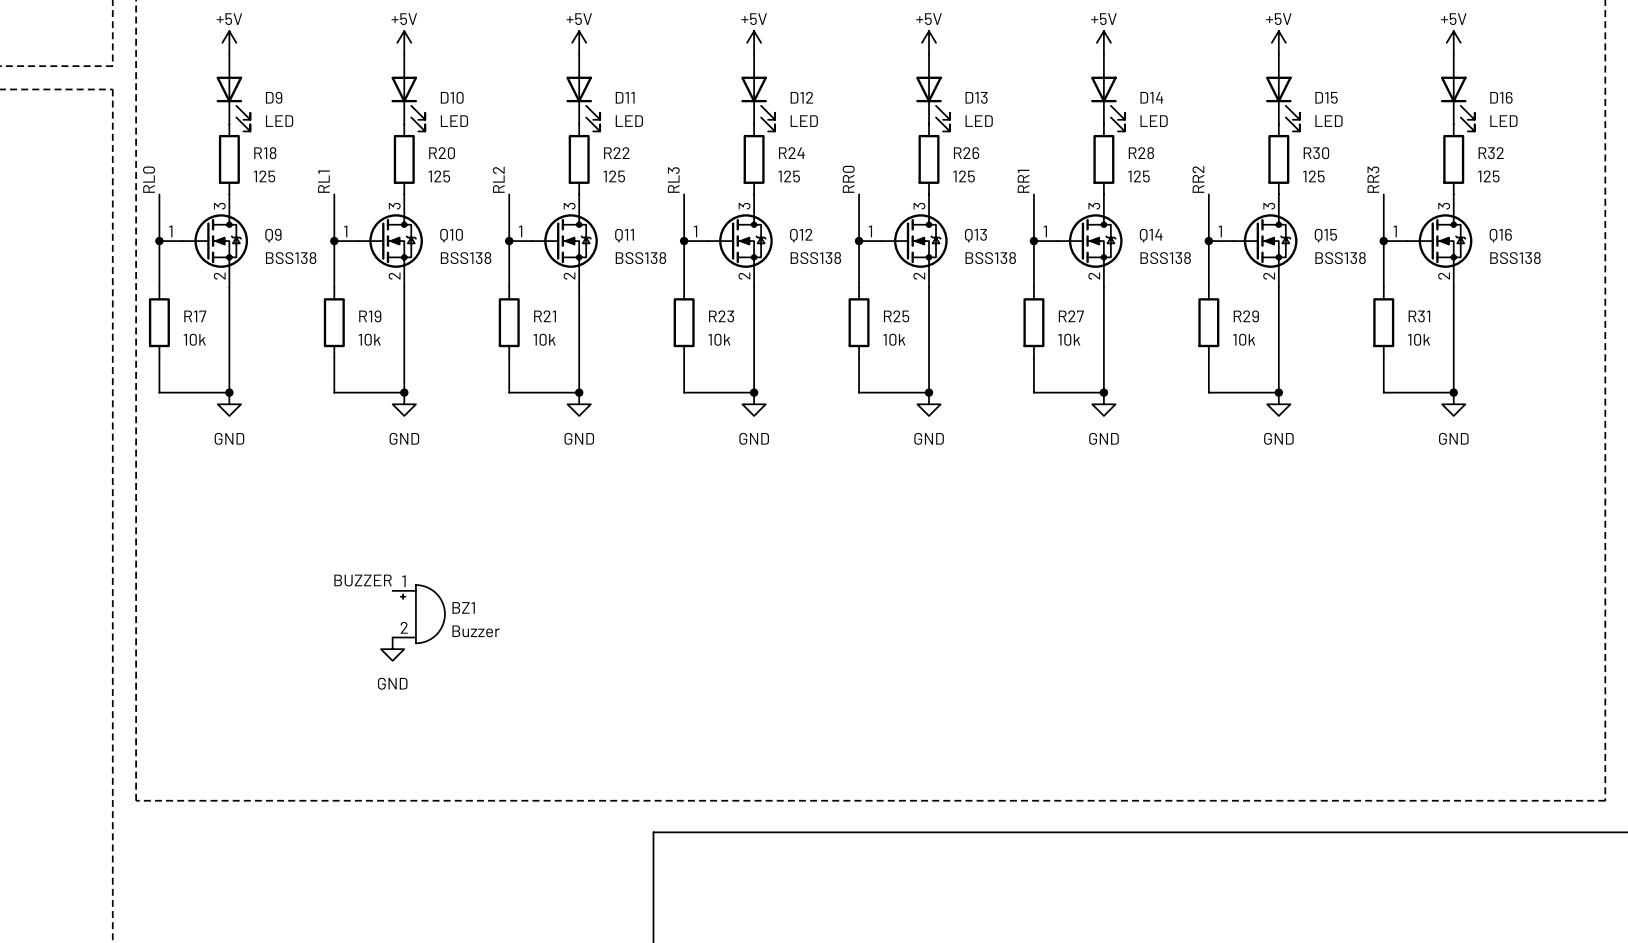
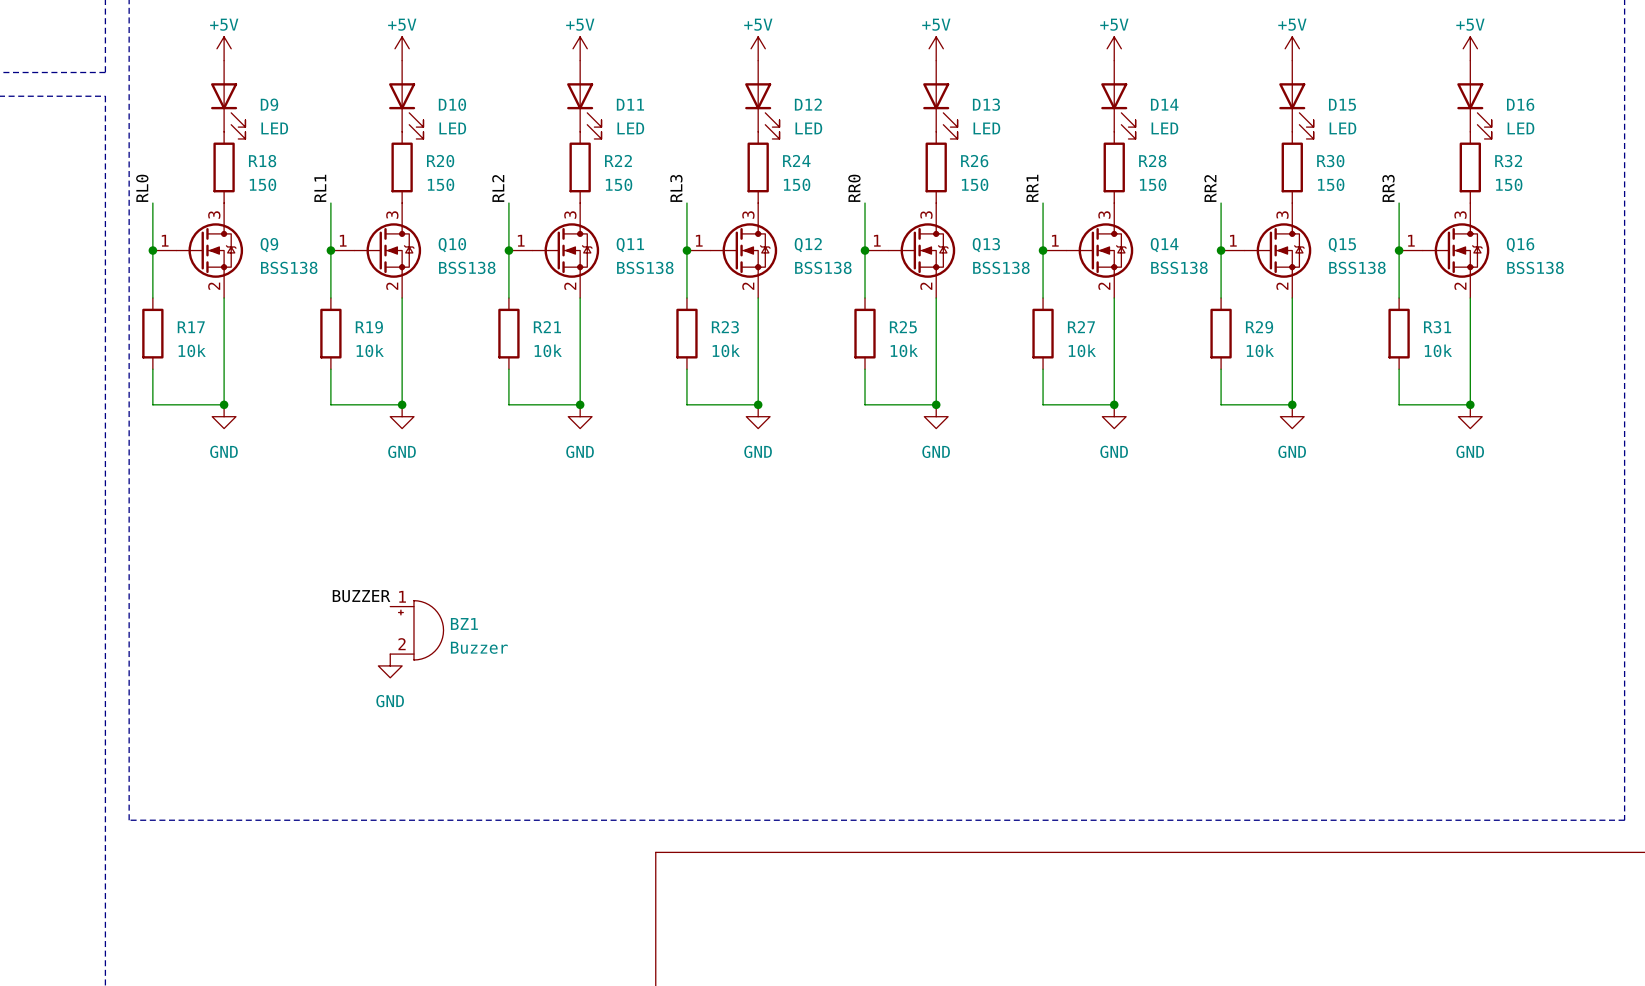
R18 value: 125 (264, 176) -> 150 (262, 184)
R20 value: 125 (439, 176) -> 150 (441, 184)
R22 value: 125 (614, 176) -> 150 (619, 184)
R24 value: 125 (789, 176) -> 150 (797, 184)
R26 value: 125 (964, 176) -> 150 (975, 184)
R28 value: 125 (1138, 176) -> 150 (1153, 184)
R30 value: 125 (1313, 176) -> 150 (1331, 184)
R32 value: 125 (1488, 176) -> 150 (1509, 184)

